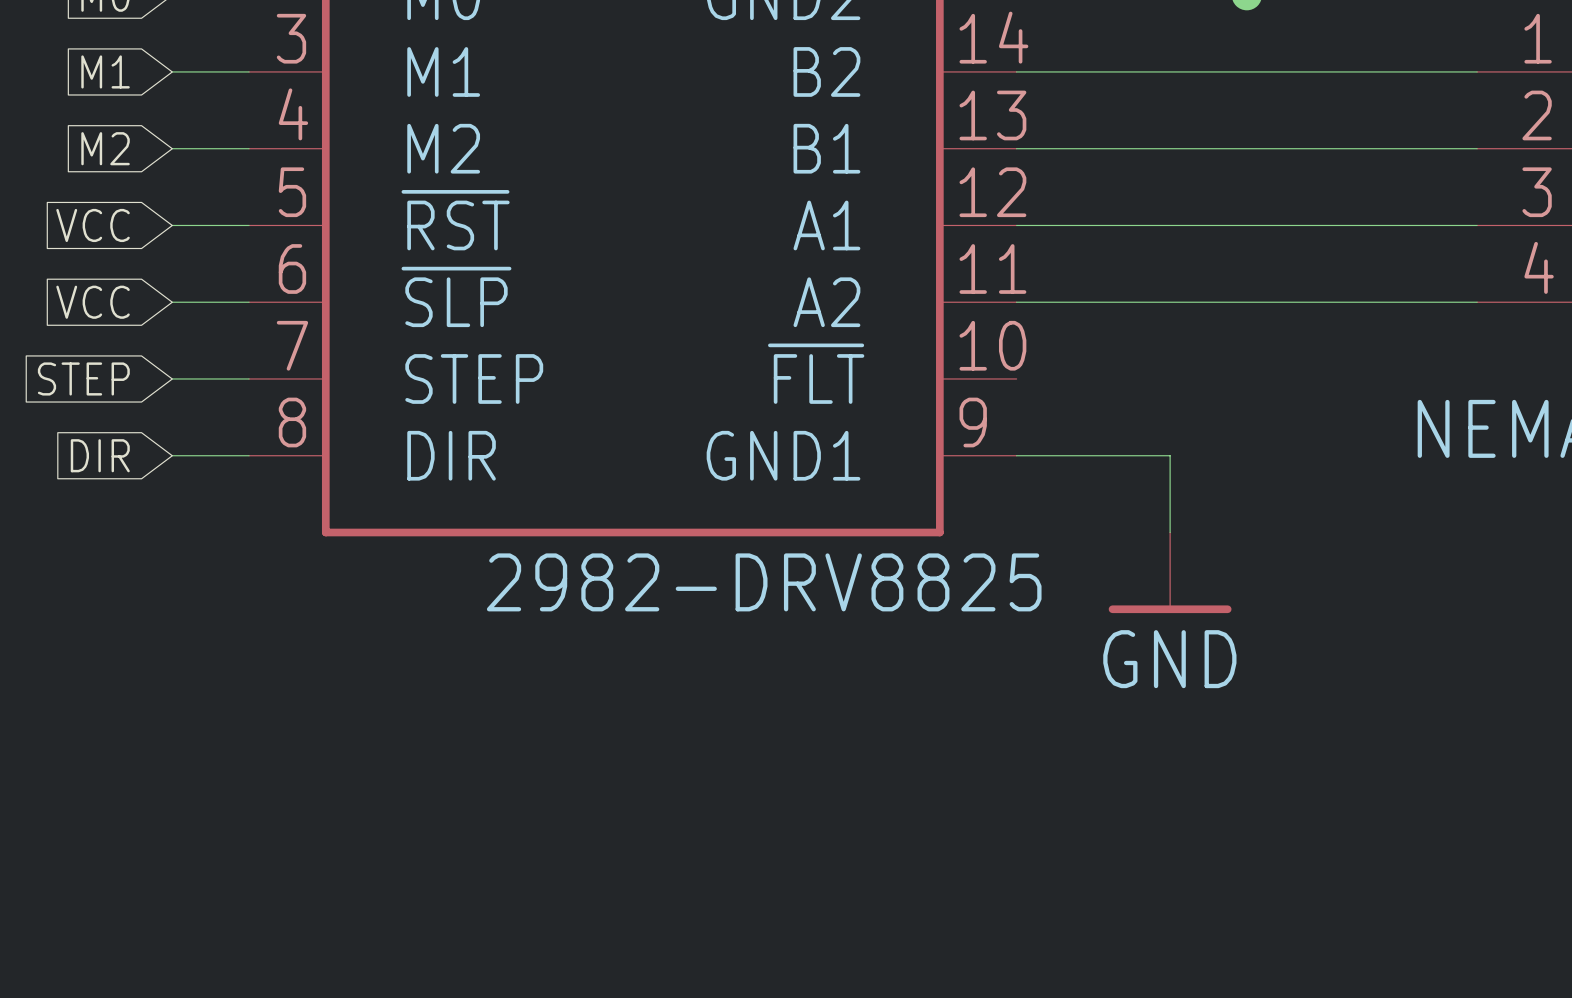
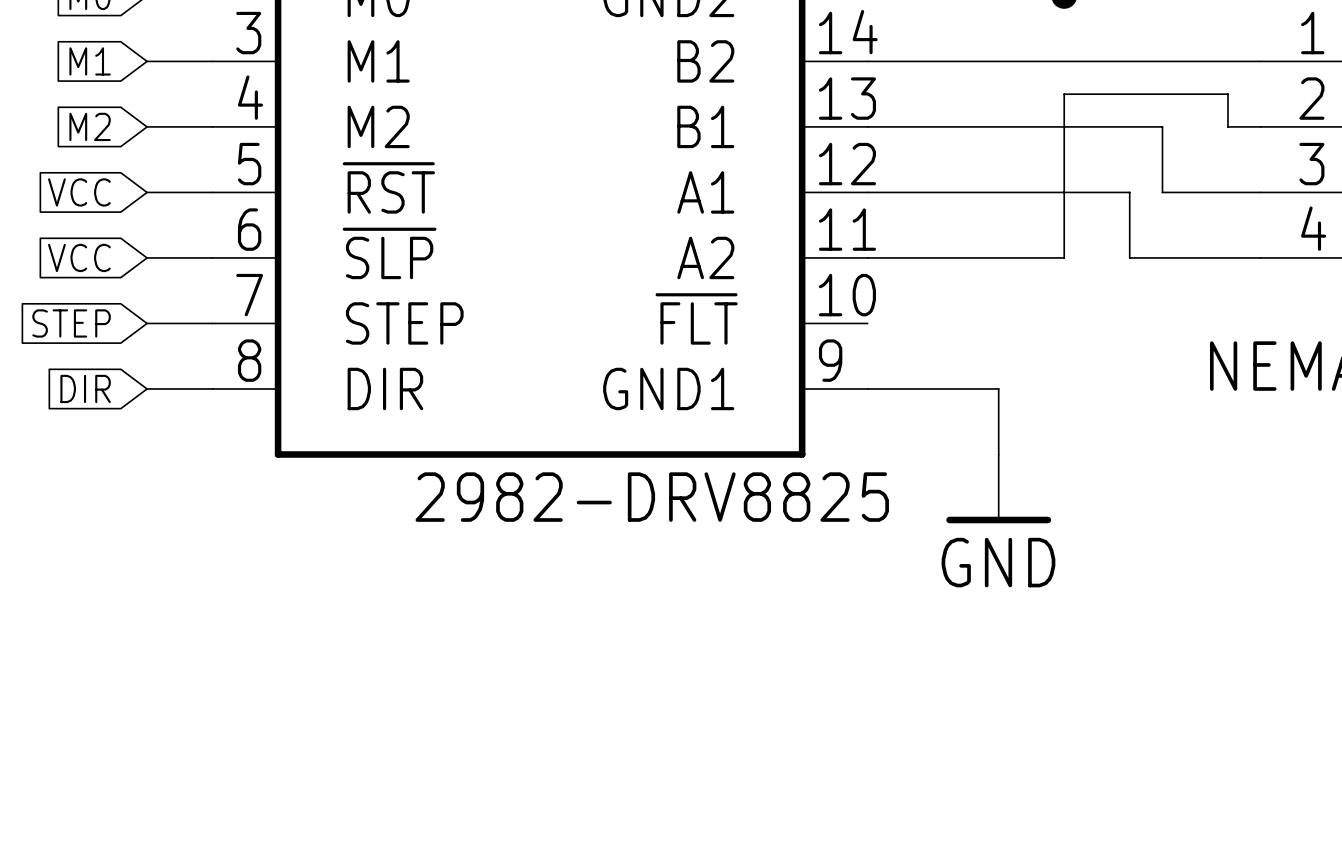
wire: (1362, 148) (1438, 148) -> (1064, 257) (1064, 94) (1227, 94) (1227, 126)
wire: (1323, 225) (1362, 225) -> (1162, 126) (1162, 192)
wire: (1246, 302) (1323, 302) -> (1129, 192) (1129, 257)

